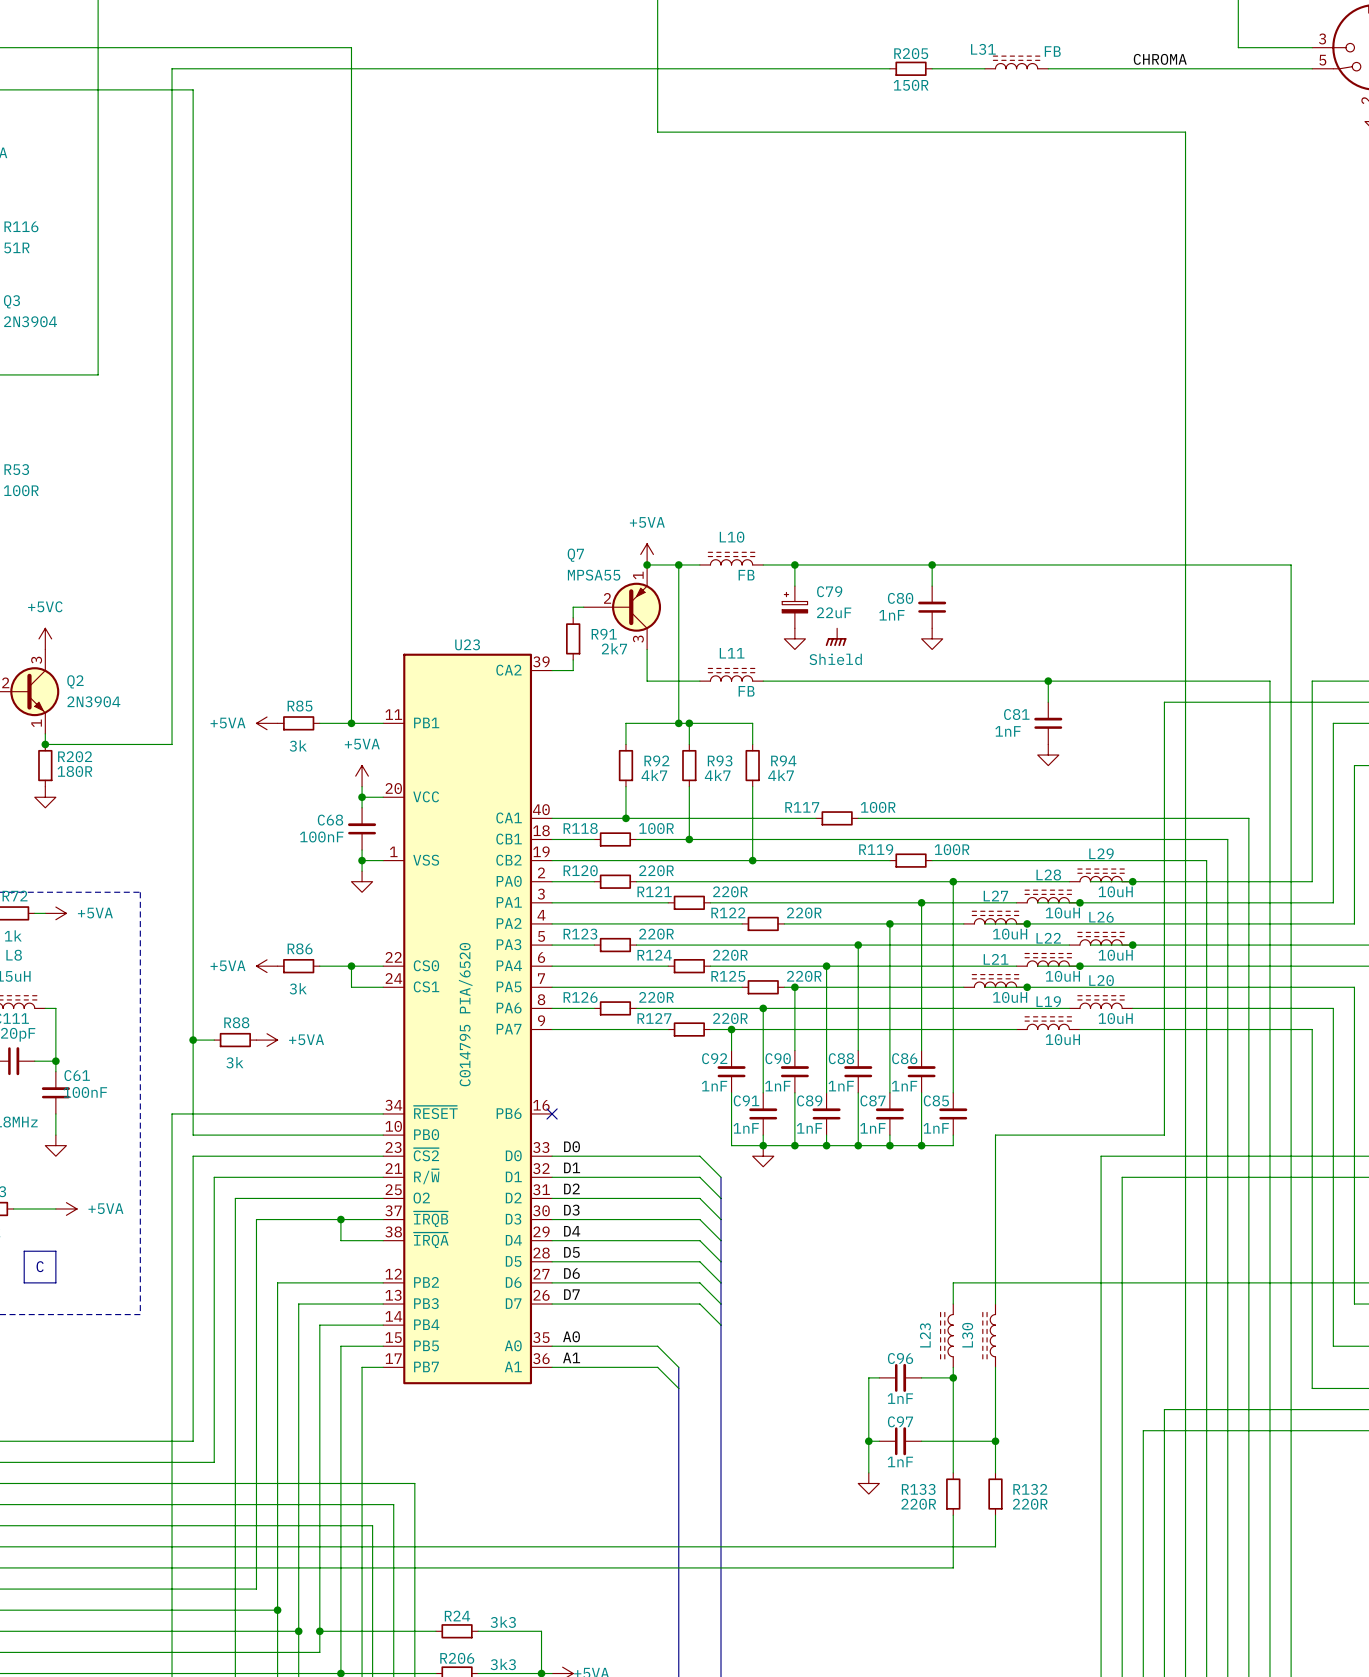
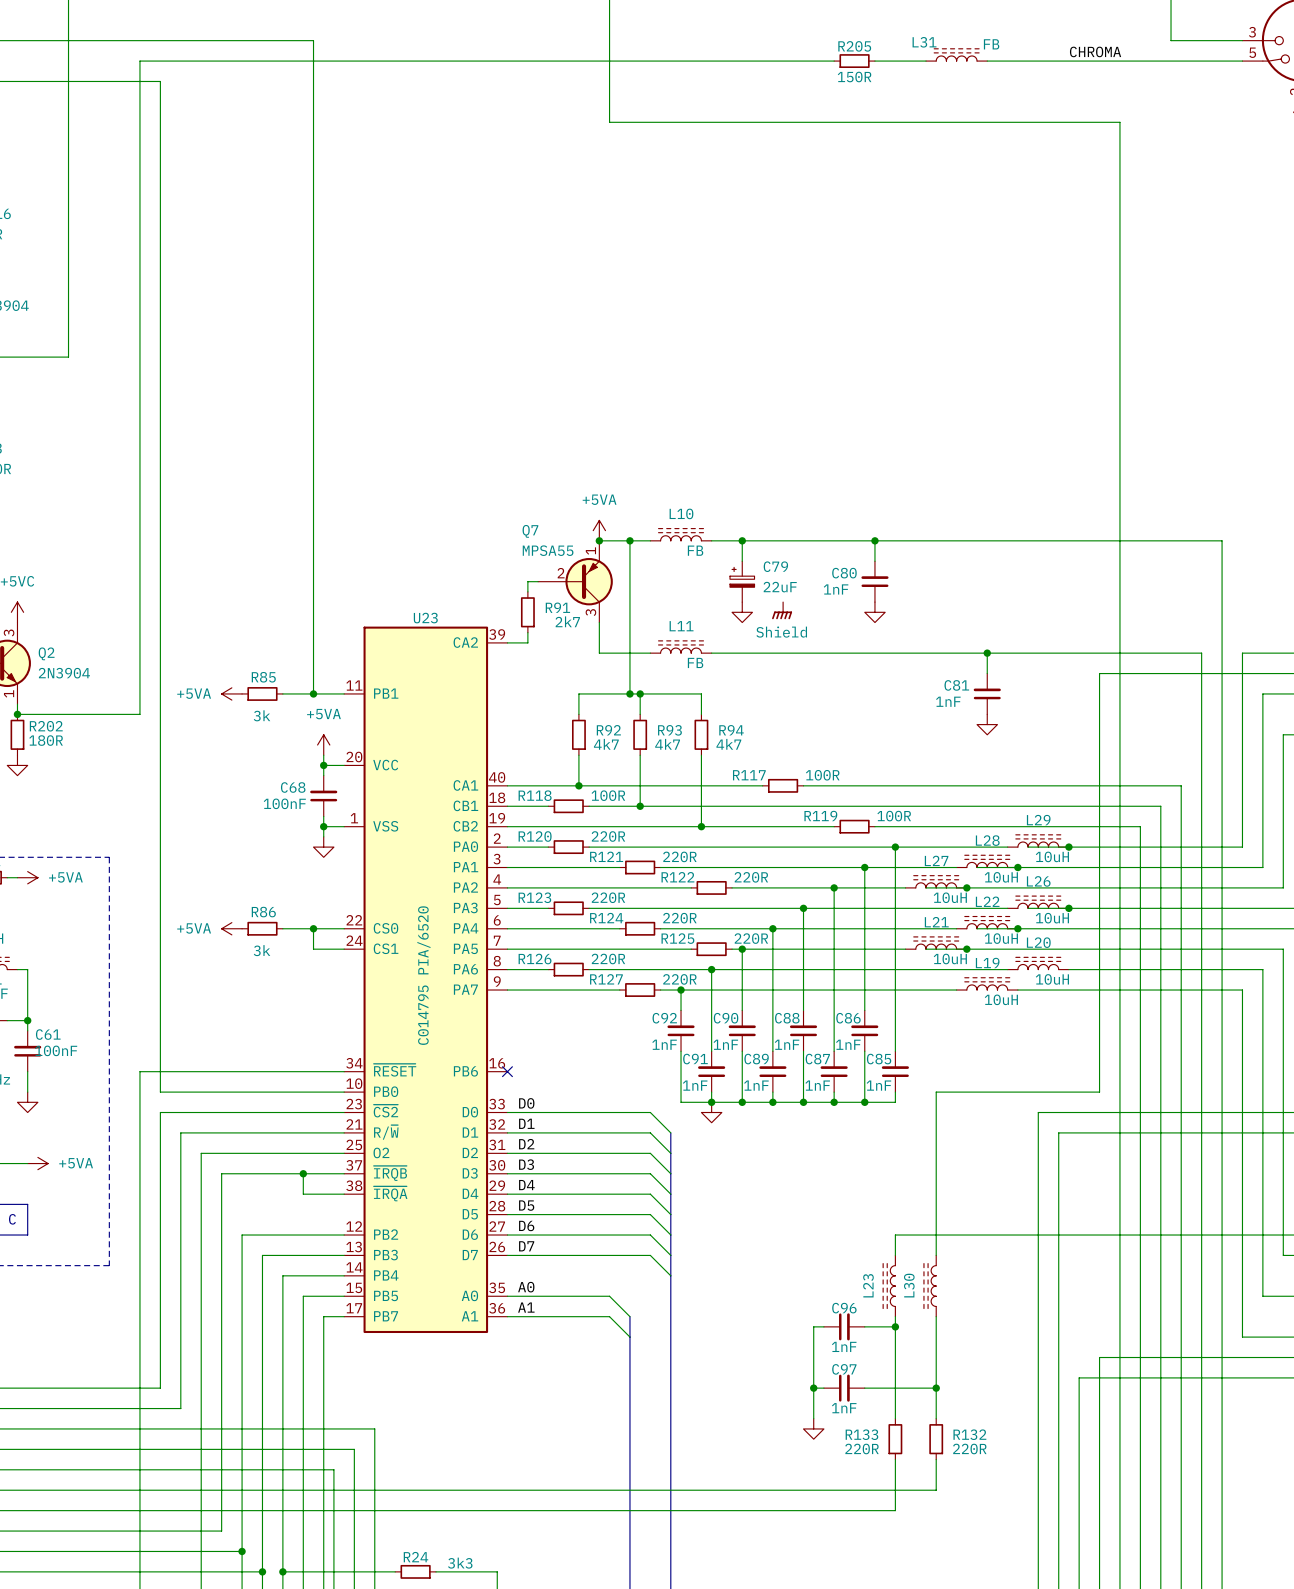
wire: (193, 1040) (214, 1040) -> none
junction: (193, 1040) -> none
R88: 3k (235, 1040) -> none
power symbol: +5VA (267, 1040) -> none

